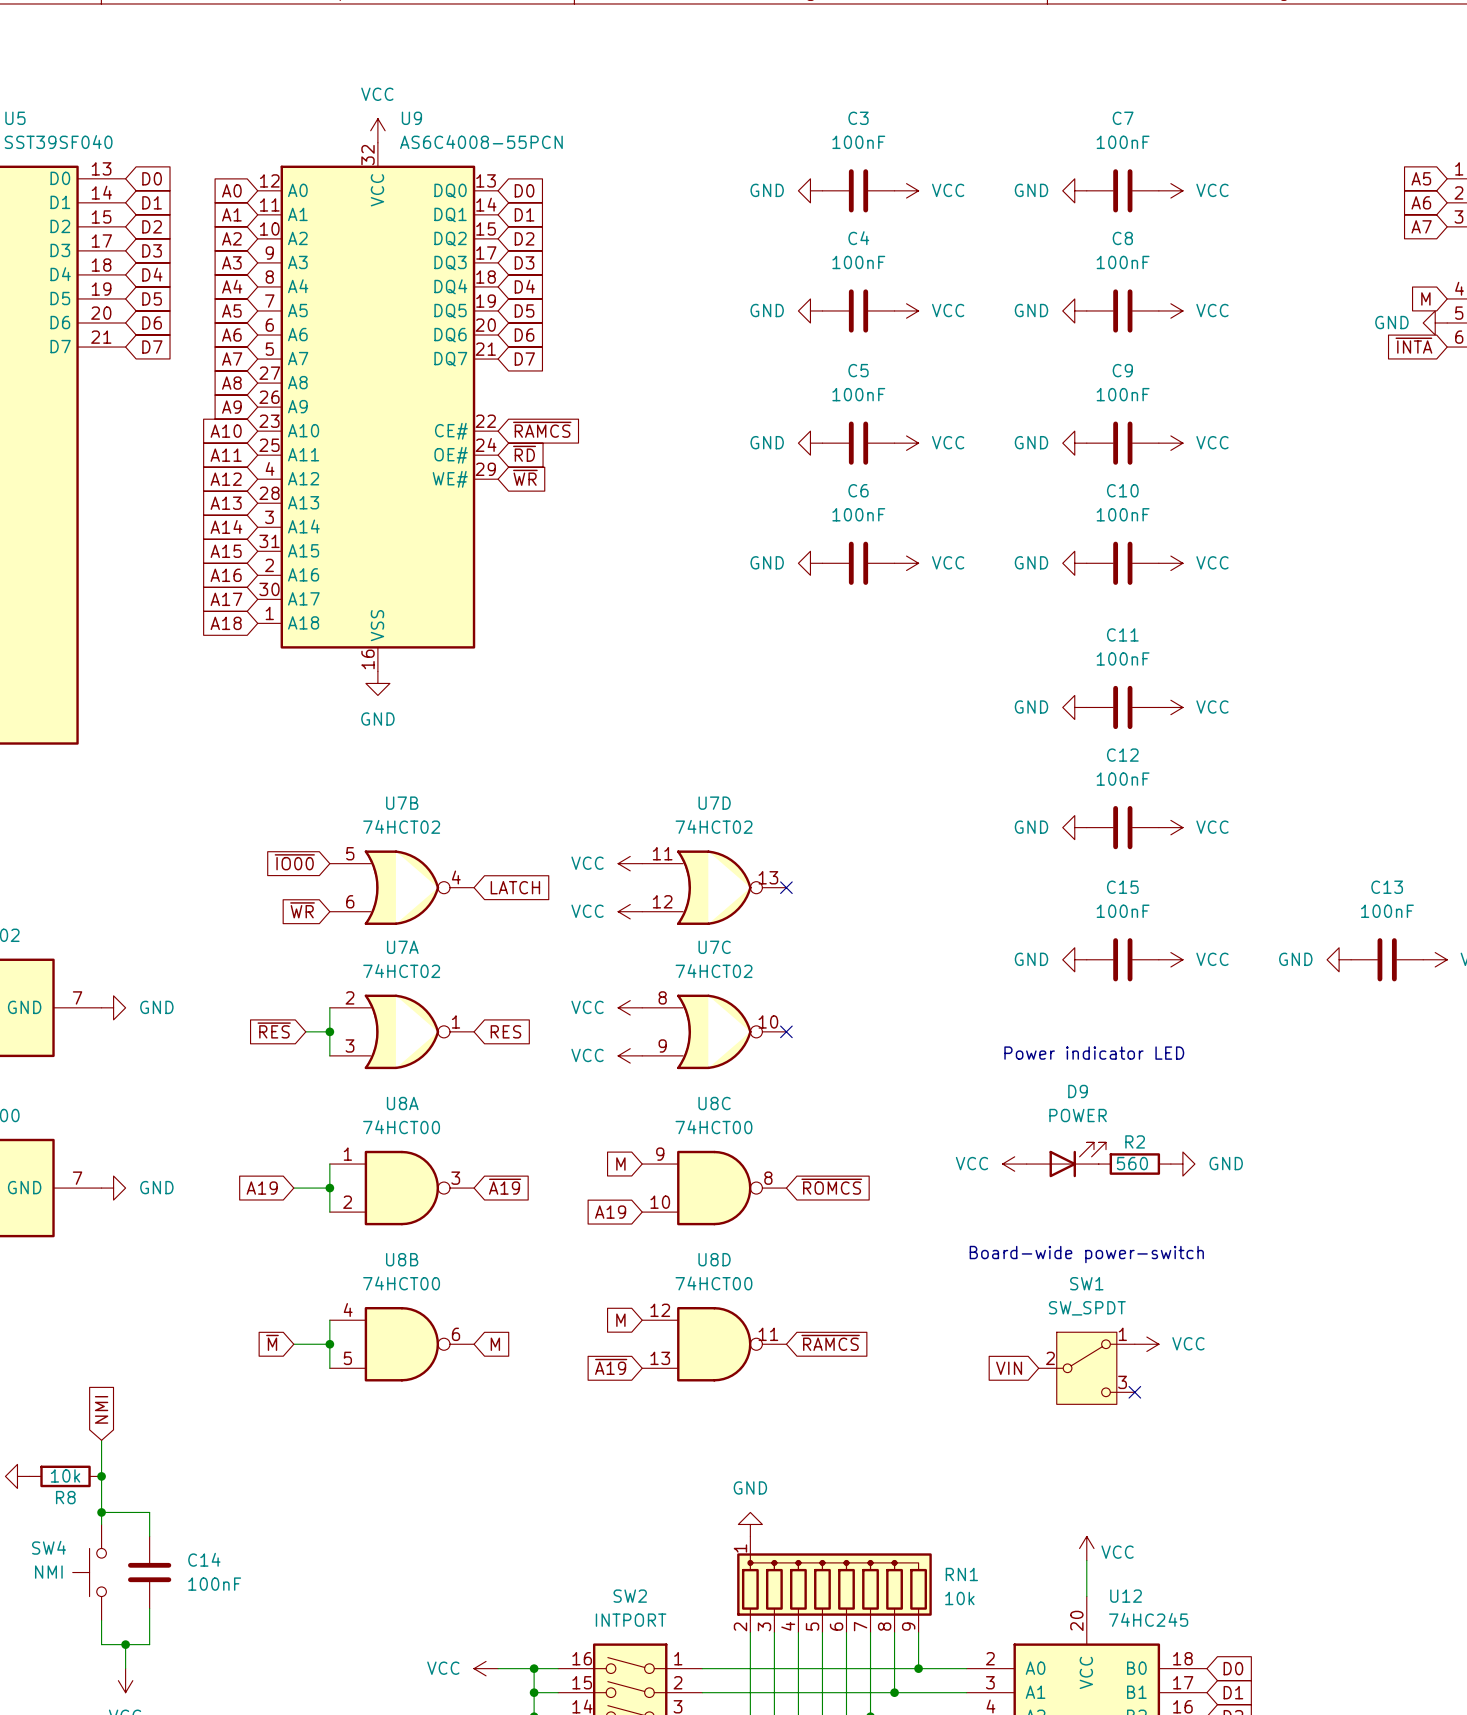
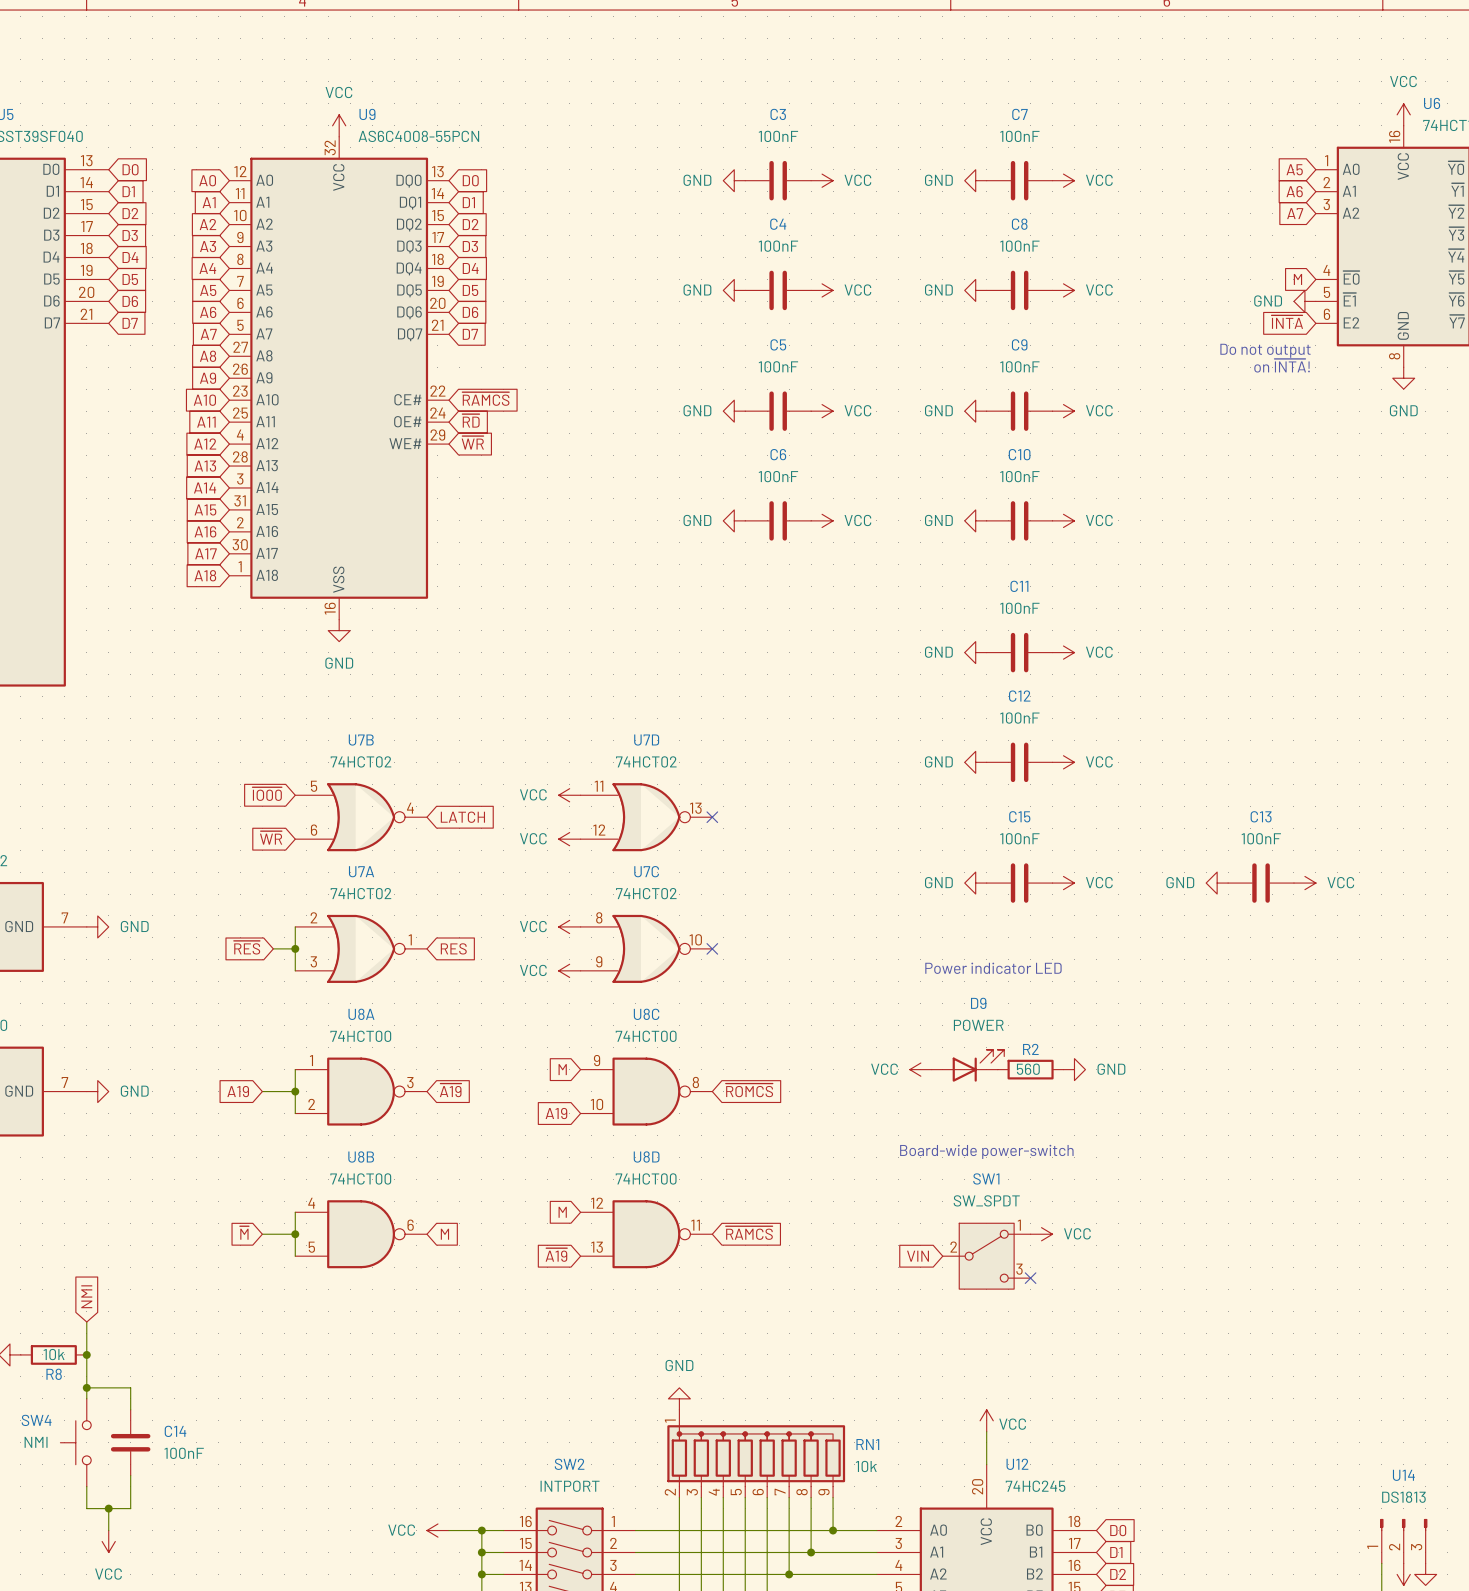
text: none -> Do not output (1265, 350)
text: none -> on ~{INTA}! (1282, 365)

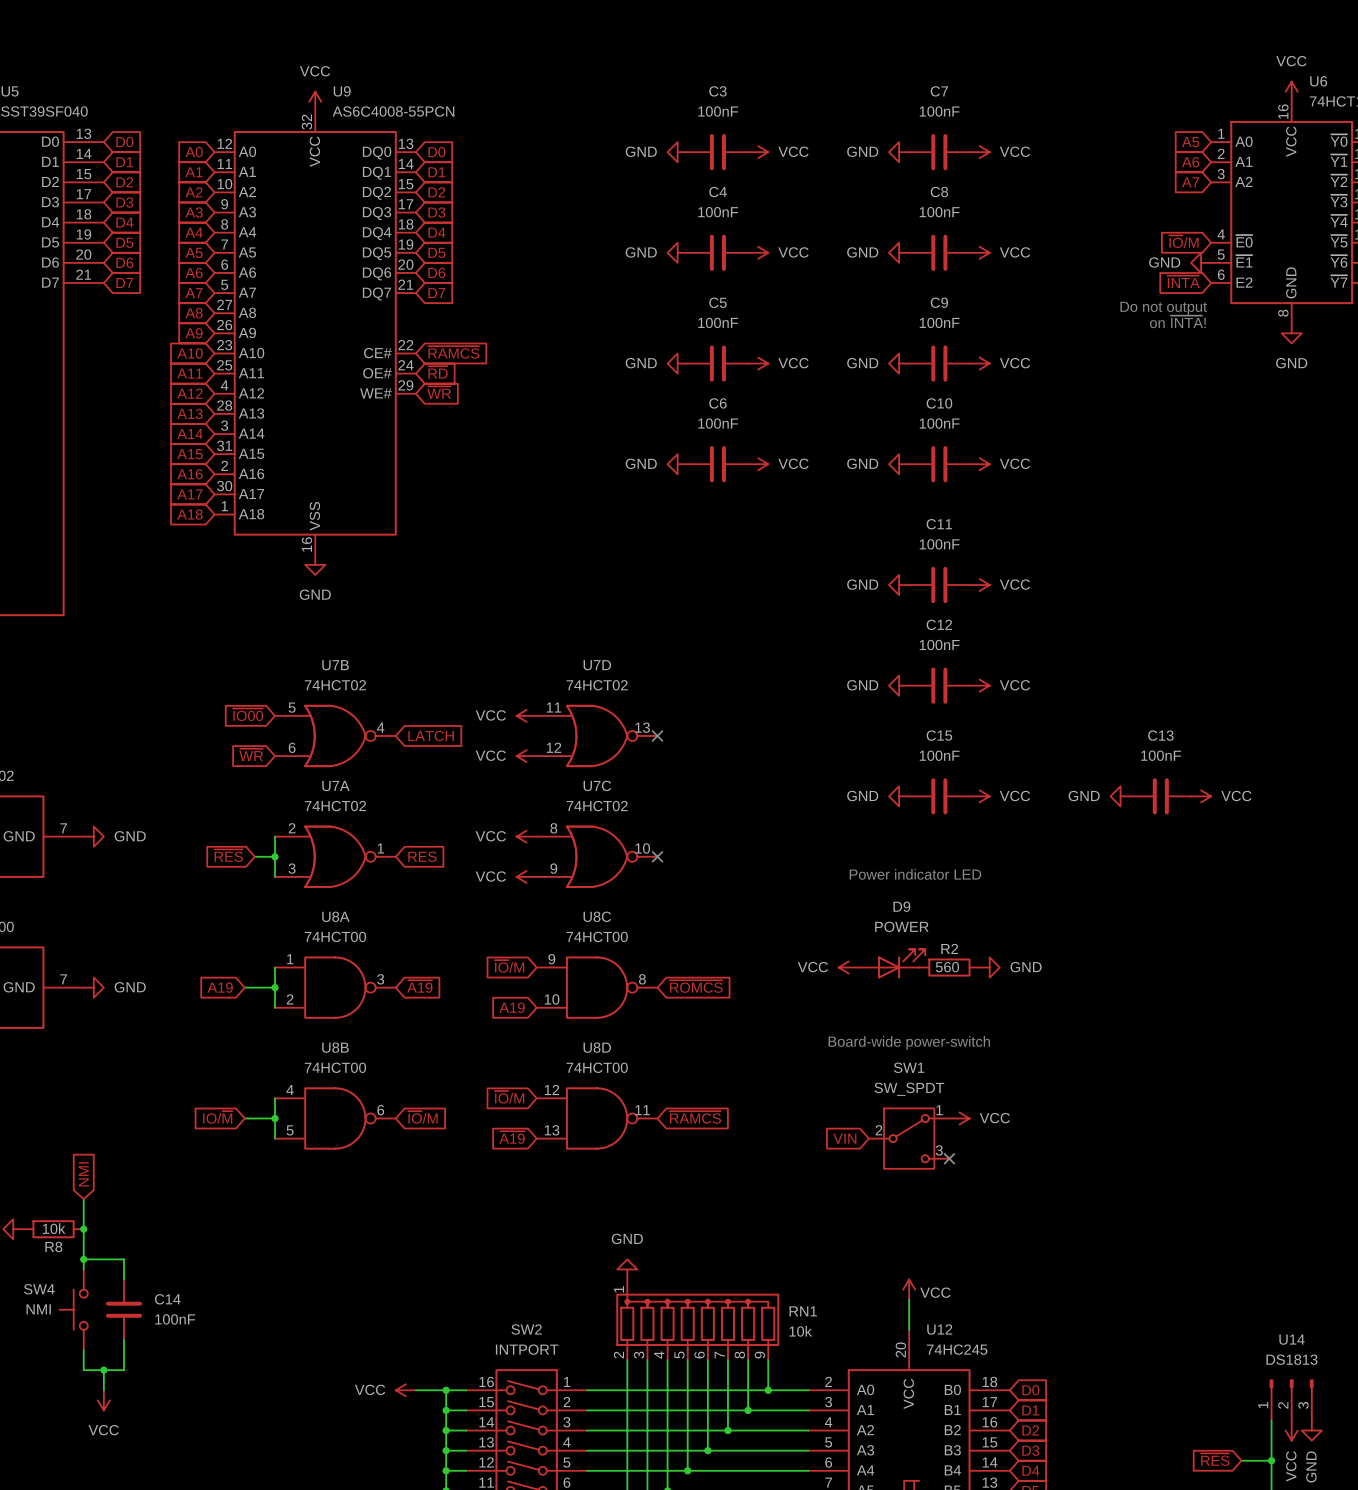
global label: M (1297, 279) -> ~{IO}/M (1183, 241)
global label: M (562, 1069) -> ~{IO}/M (509, 966)
global label: M (562, 1212) -> ~{IO}/M (509, 1097)
global label: ~{M} (244, 1232) -> IO/~{M} (217, 1117)
global label: M (444, 1234) -> ~{IO}/M (422, 1117)

